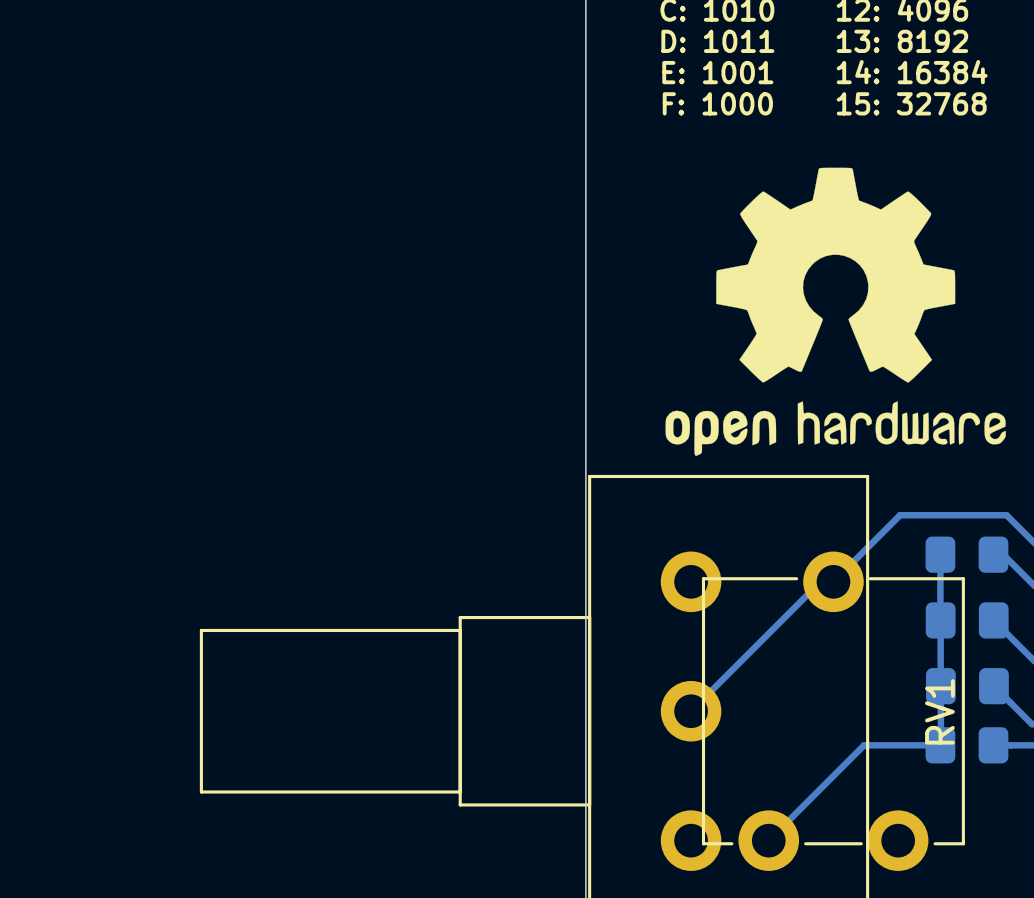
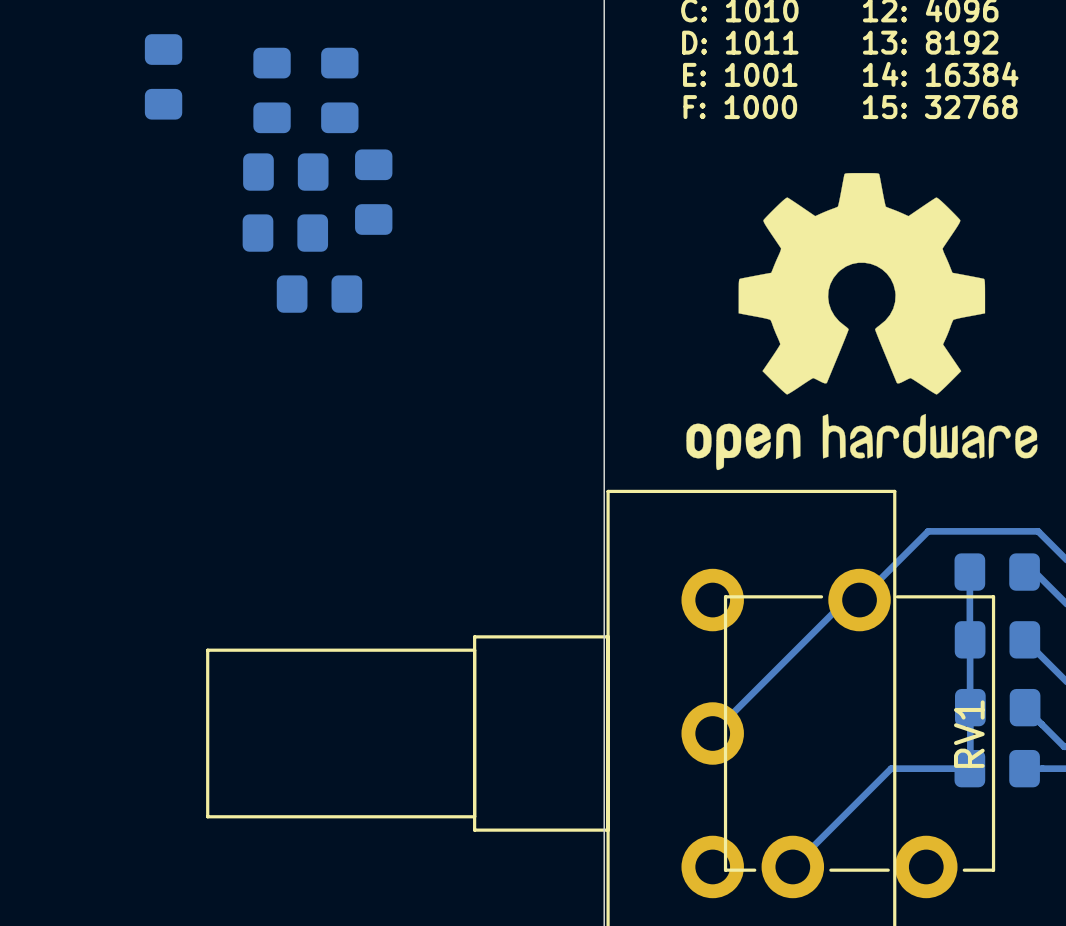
part: none -> (163, 76)
part: none -> (272, 90)
part: none -> (339, 90)
part: none -> (285, 172)
part: none -> (373, 192)
part: none -> (285, 233)
part: none -> (319, 294)

